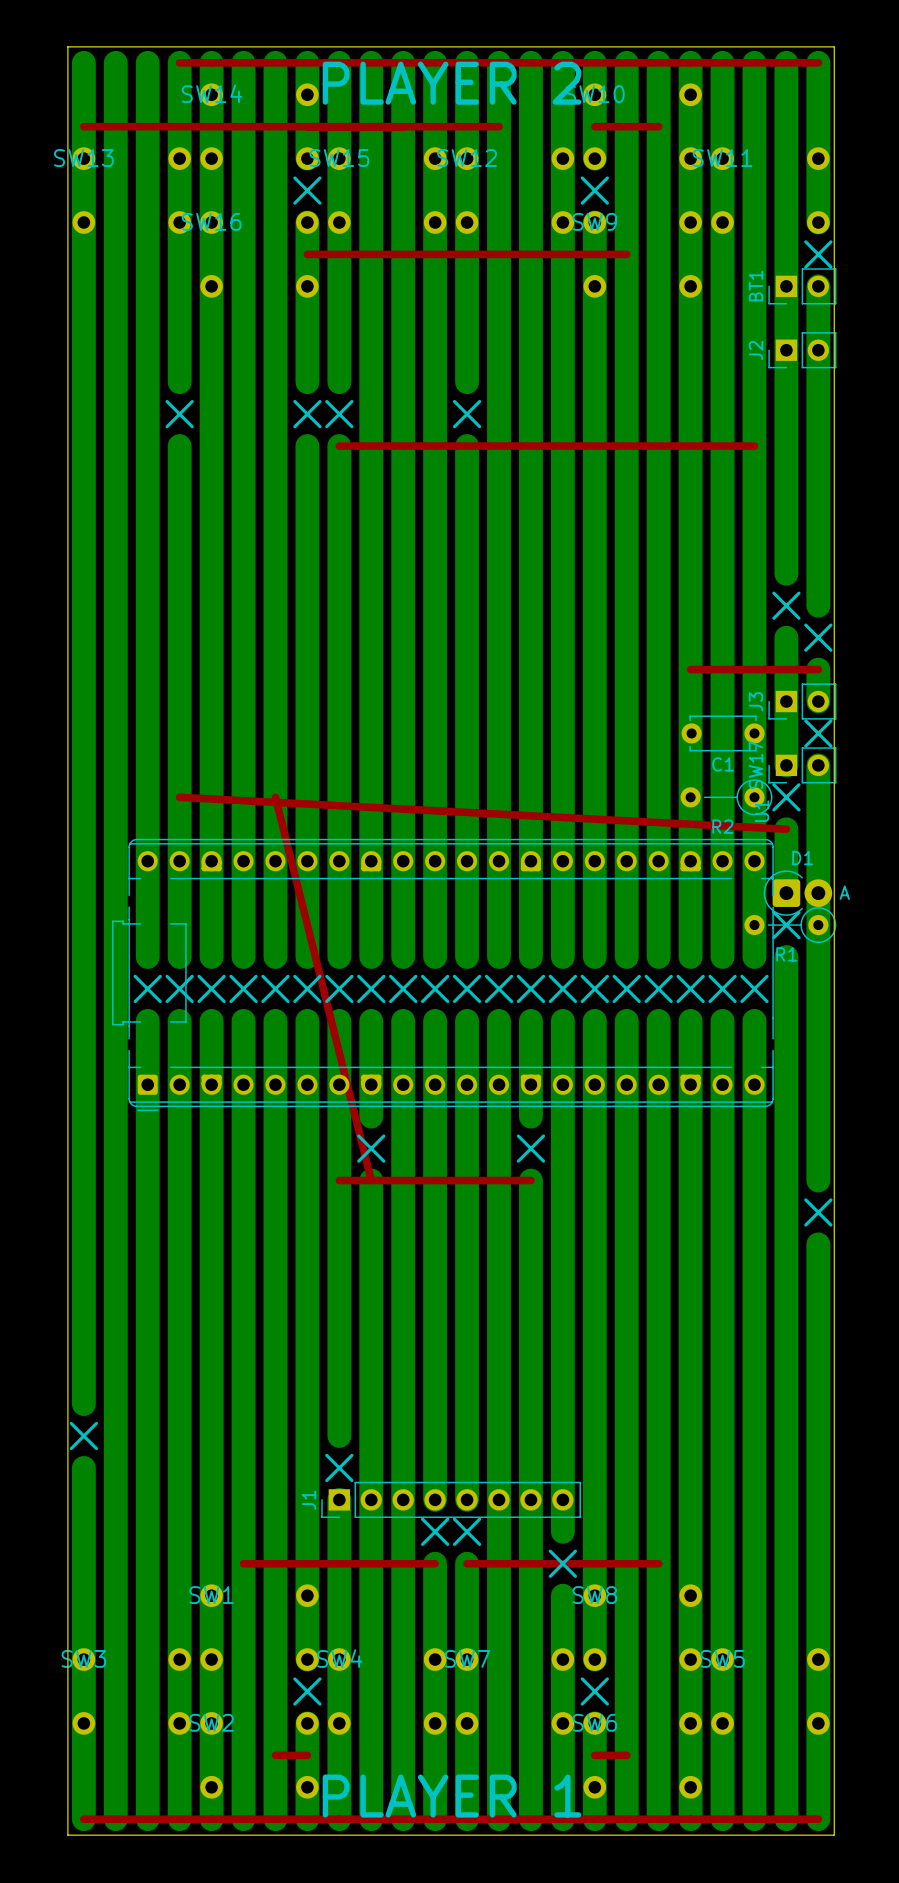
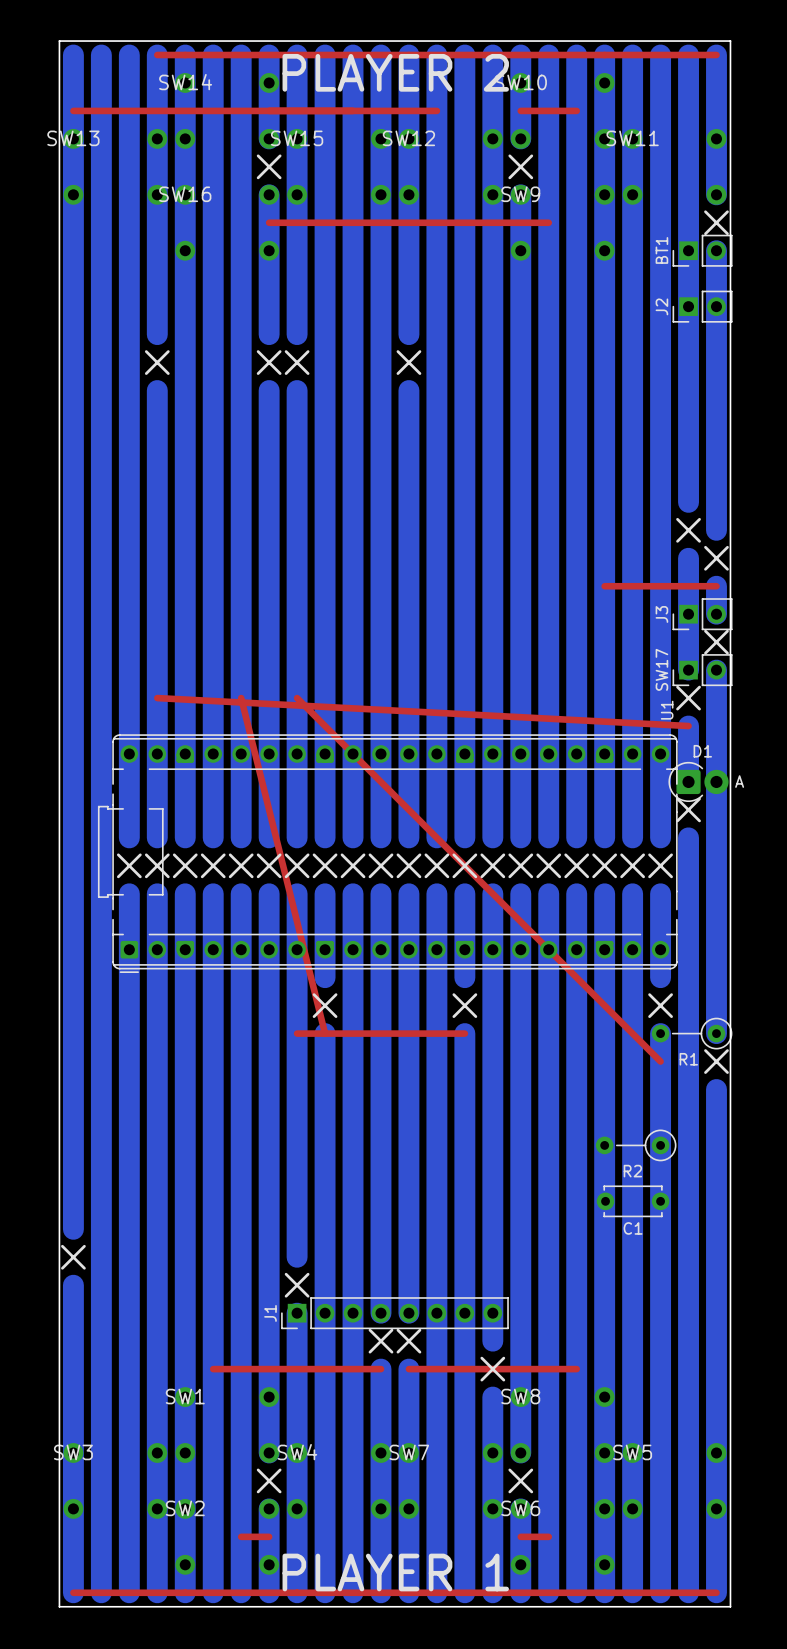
top track: (339, 446) (754, 446) -> none
C1 position: (723, 733) -> (633, 1201)
top track: none -> (297, 698) (660, 1061)
R2 position: (726, 797) -> (636, 1145)
R1 position: (790, 925) -> (692, 1033)
bottom track: (754, 1116) (754, 1180) -> none
line: none -> (649, 994) (671, 1016)
line: none -> (671, 994) (649, 1016)

